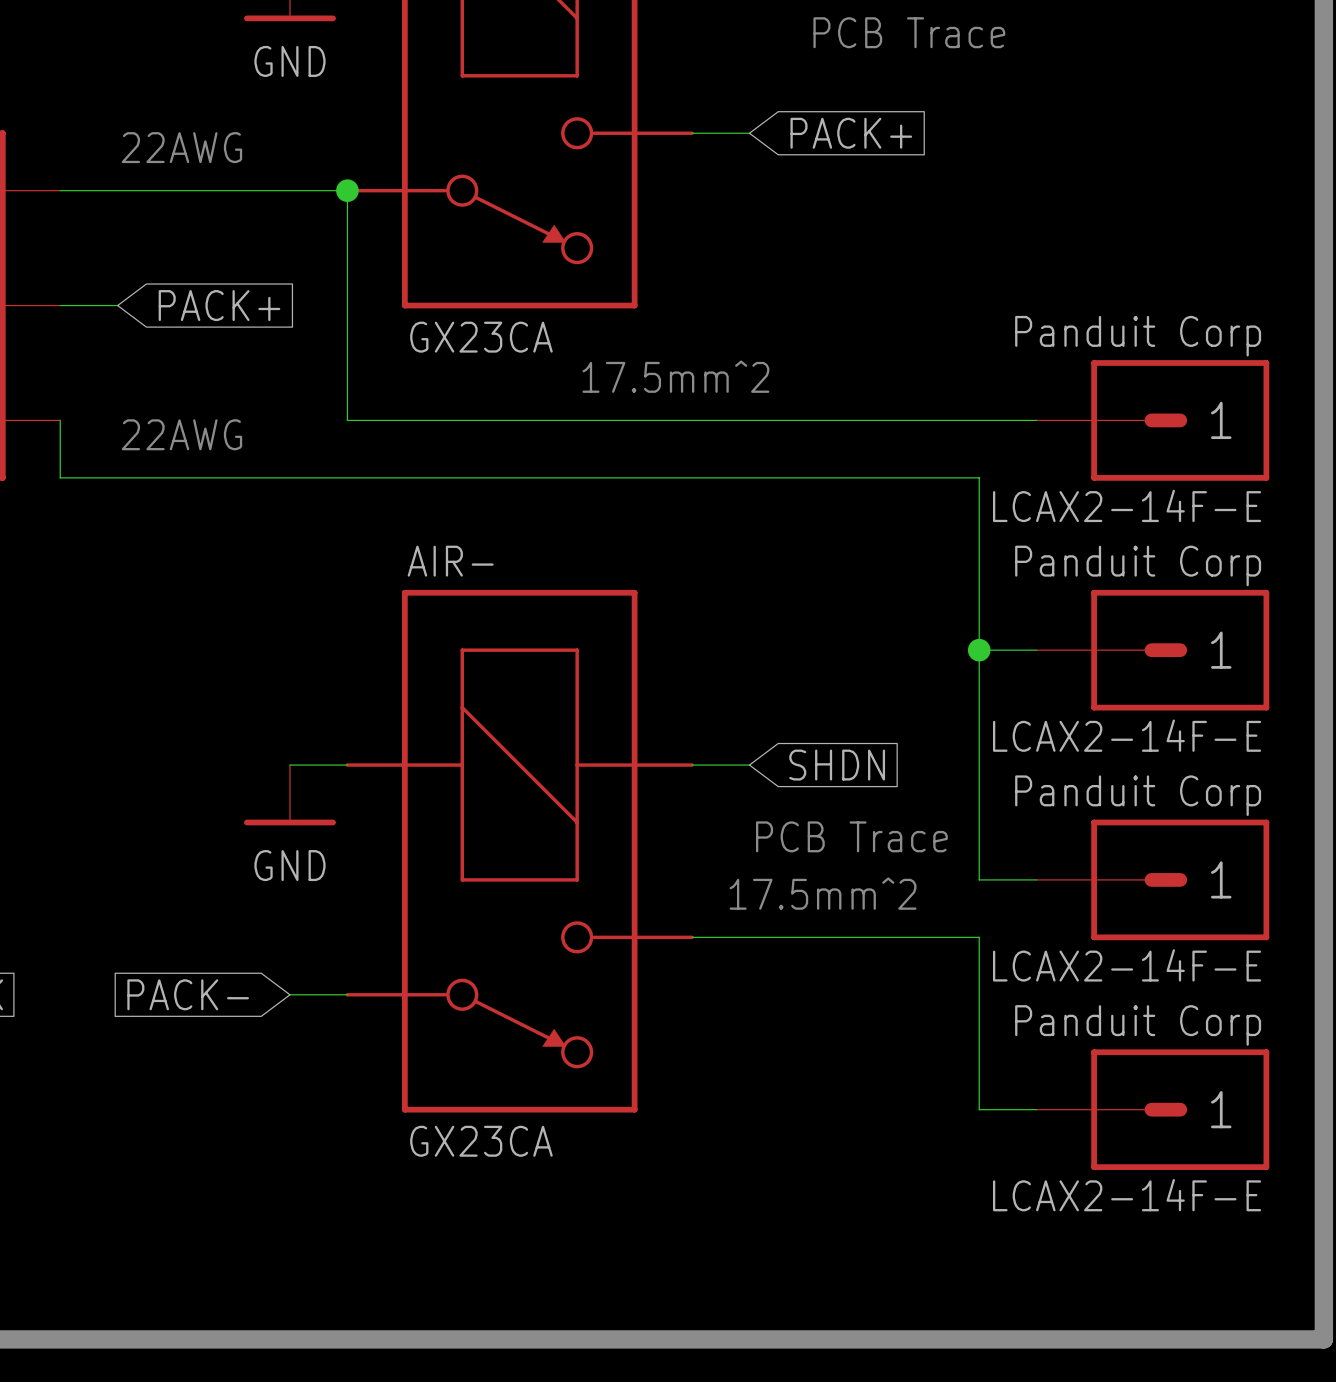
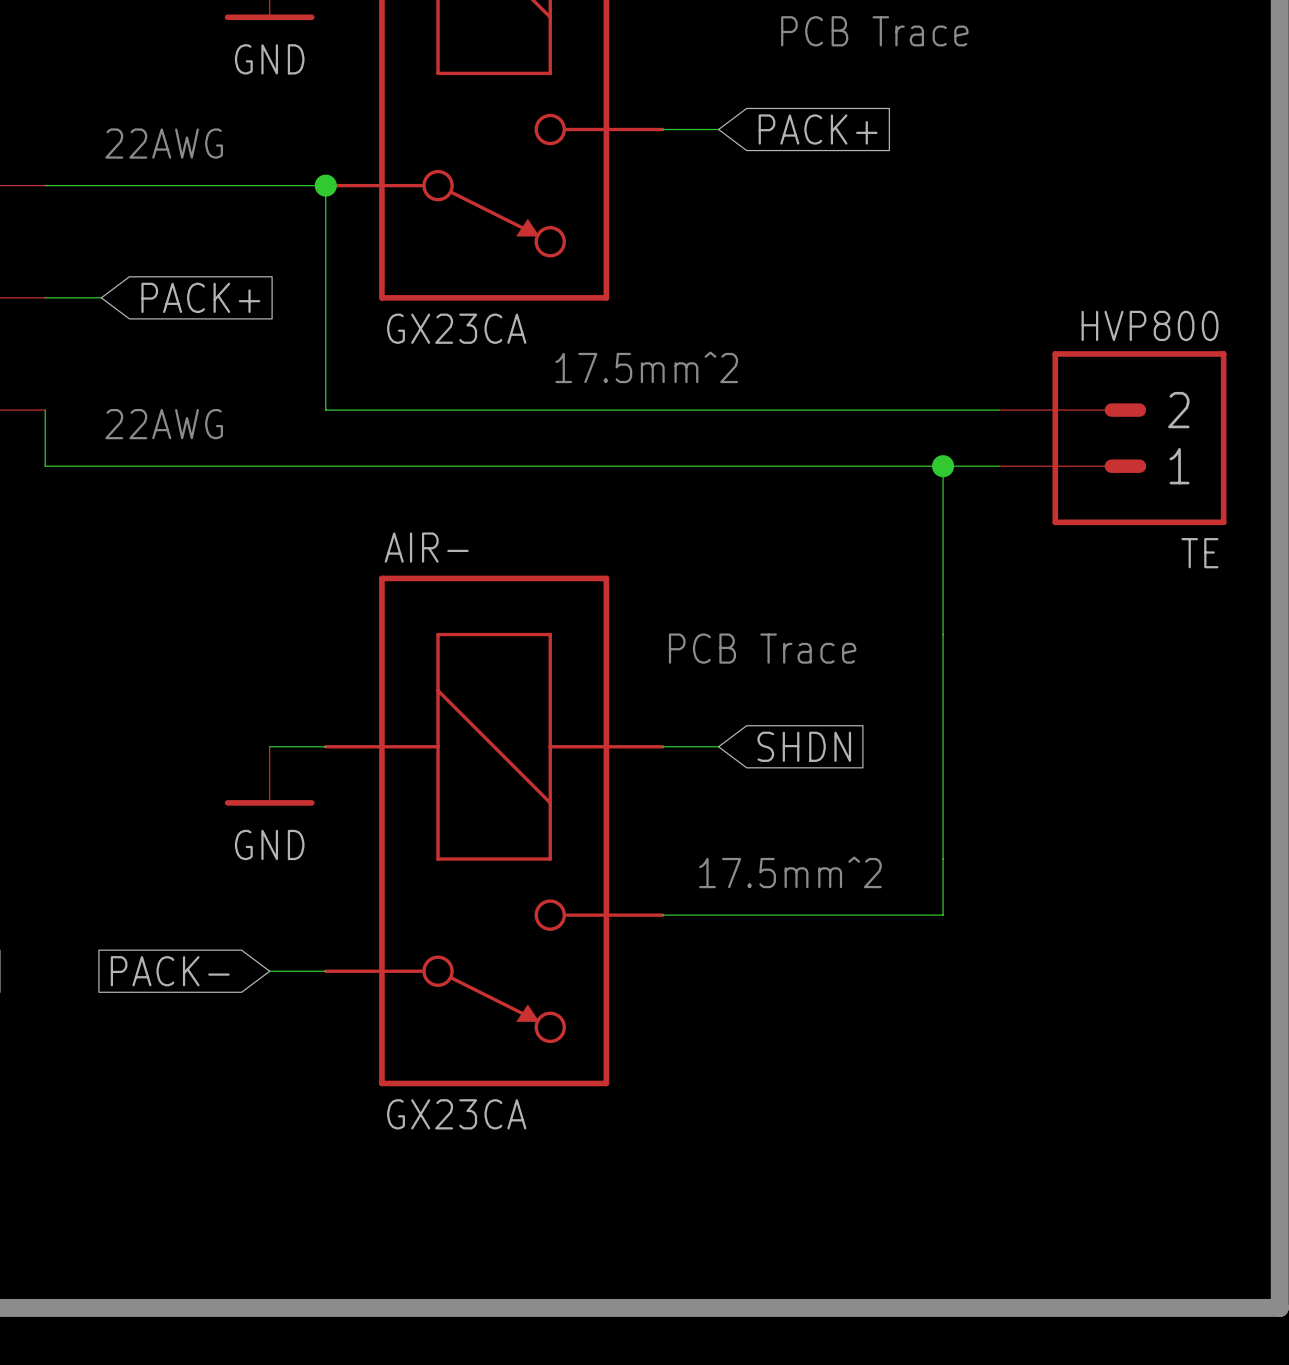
part: (1152, 420) -> none
part: none -> (1112, 438)
junction: none -> (943, 466)
wire: (979, 650) (1036, 650) -> (943, 466) (999, 466)
junction: (979, 650) -> none
part: (1152, 650) -> none
text position: PCB Trace (851, 836) -> PCB Trace (762, 648)
wire: (979, 879) (1036, 879) -> (943, 859) (943, 915)
part: (1152, 879) -> none
wire: (979, 937) (979, 1109) (1036, 1109) -> none
part: (1152, 1109) -> none

